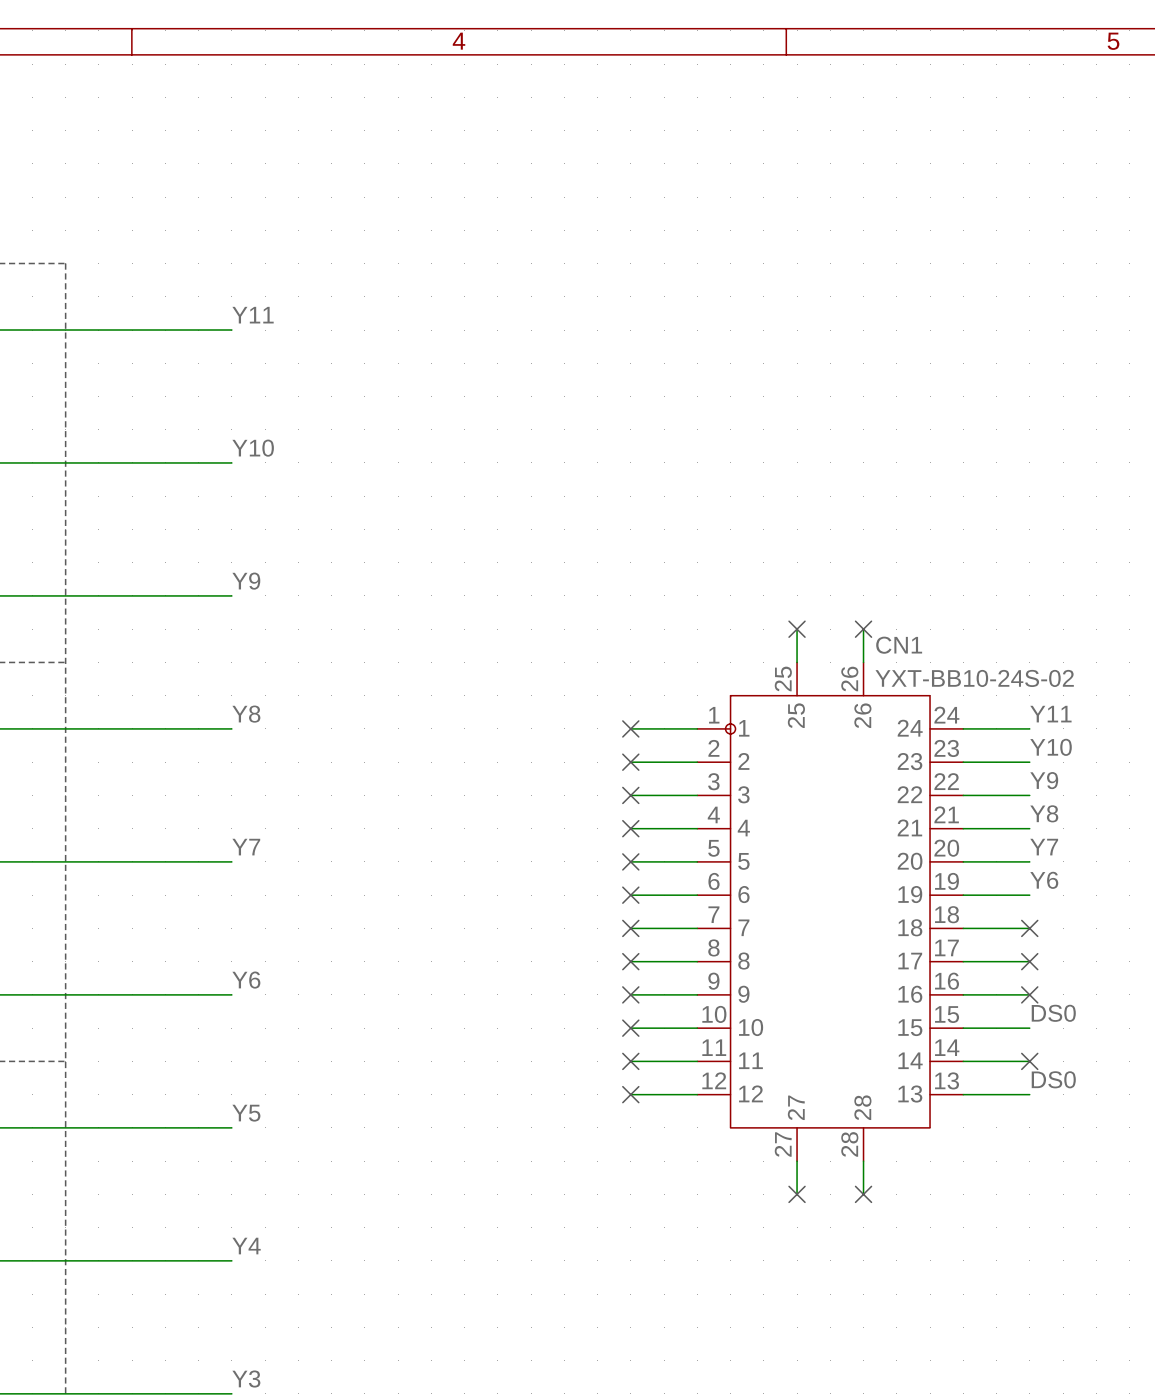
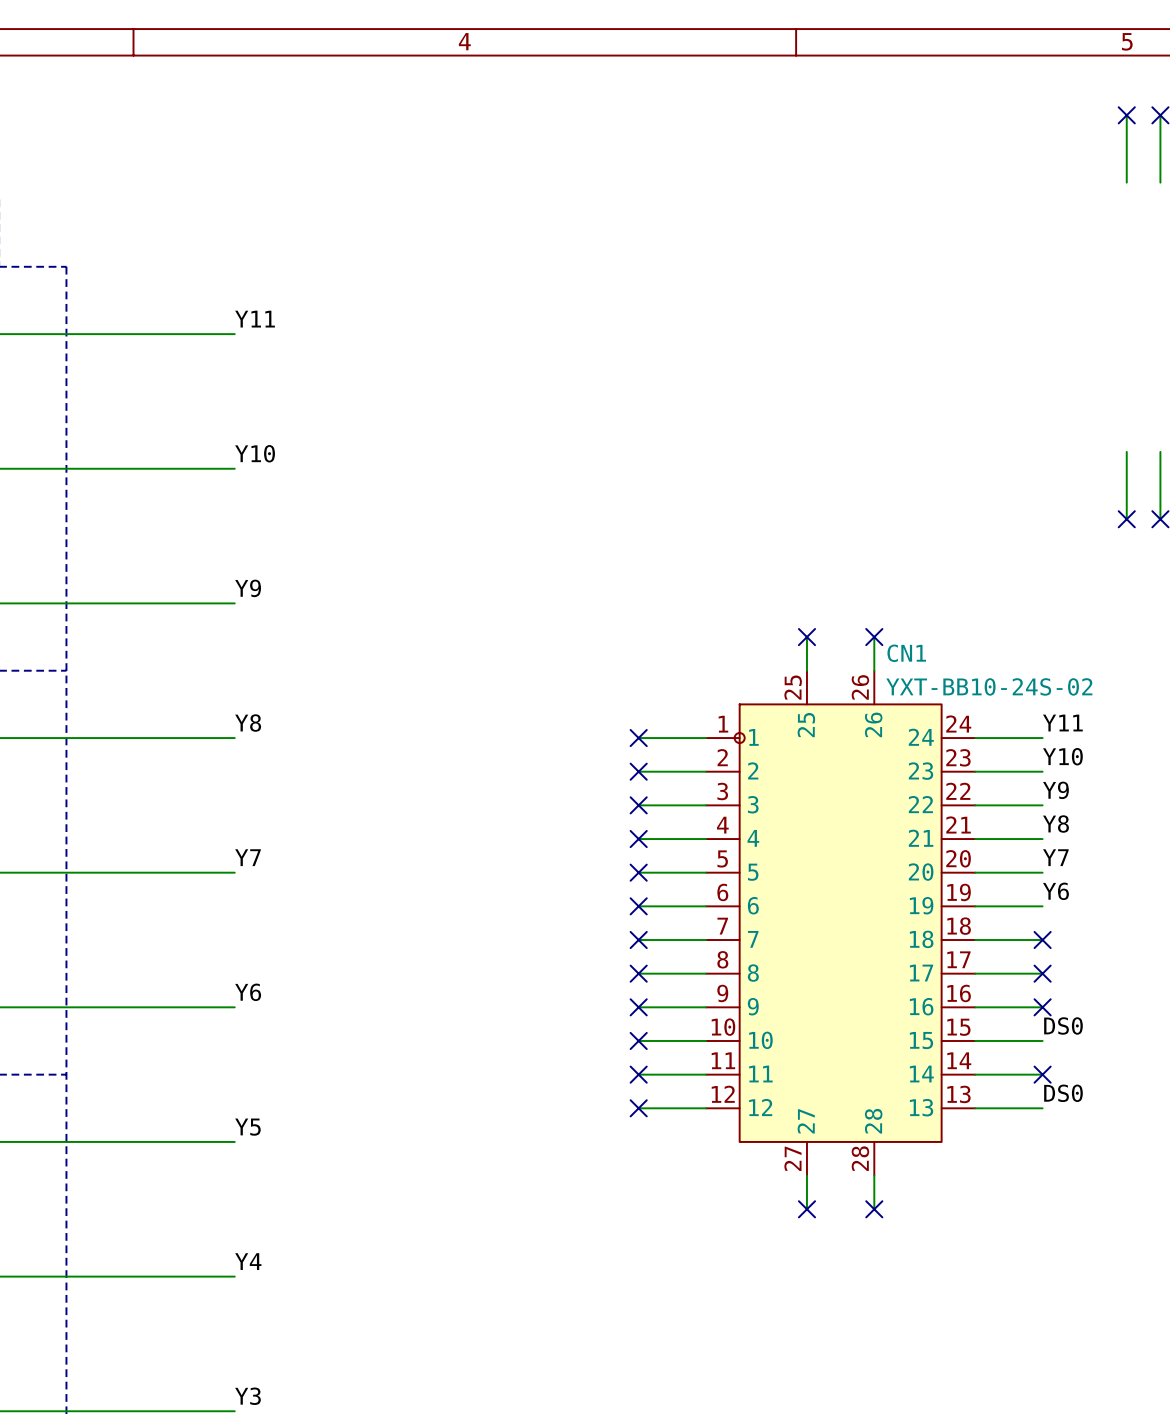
wire: none -> (1126, 115) (1126, 182)
no-connect mark: none -> (1126, 115)
wire: none -> (1160, 115) (1160, 182)
no-connect mark: none -> (1160, 115)
wire: none -> (1126, 451) (1126, 519)
wire: none -> (1160, 451) (1160, 519)
no-connect mark: none -> (1126, 519)
no-connect mark: none -> (1160, 519)

